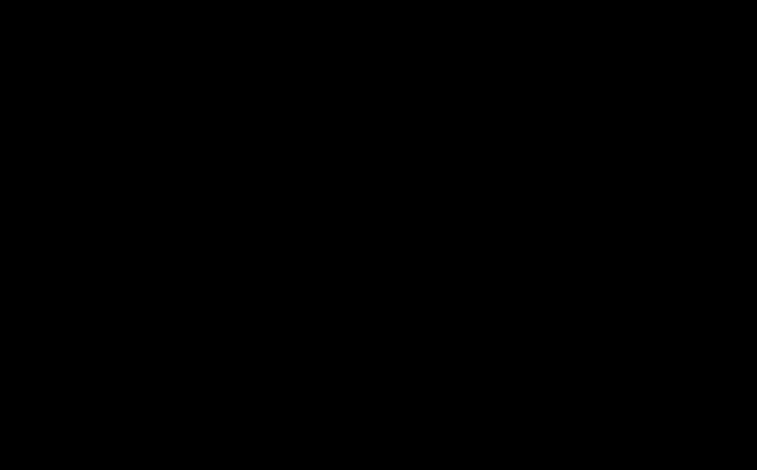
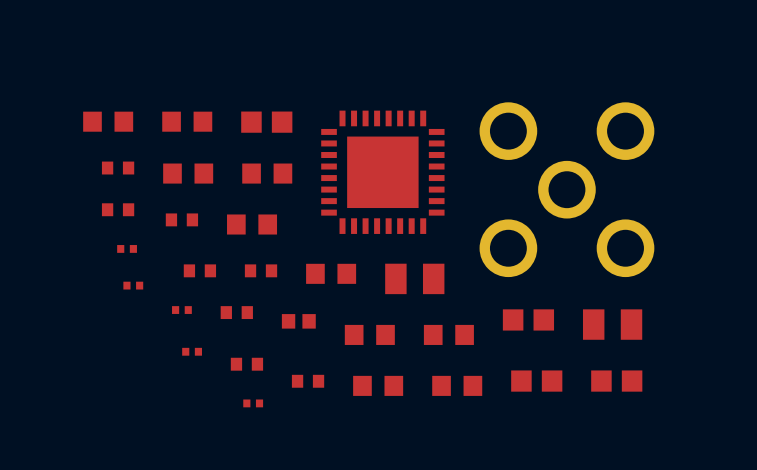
part: none -> (108, 121)
part: none -> (187, 121)
part: none -> (266, 122)
part: none -> (118, 168)
part: none -> (382, 172)
part: none -> (188, 173)
part: none -> (267, 173)
part: none -> (566, 189)
part: none -> (118, 209)
part: none -> (181, 219)
part: none -> (252, 224)
part: none -> (127, 248)
part: none -> (199, 270)
part: none -> (261, 270)
part: none -> (331, 273)
part: none -> (414, 278)
part: none -> (133, 285)
part: none -> (181, 310)
part: none -> (236, 312)
part: none -> (528, 319)
part: none -> (298, 321)
part: none -> (612, 324)
part: none -> (369, 334)
part: none -> (448, 334)
part: none -> (192, 351)
part: none -> (246, 364)
part: none -> (308, 381)
part: none -> (536, 381)
part: none -> (616, 381)
part: none -> (378, 385)
part: none -> (457, 385)
part: none -> (253, 403)

